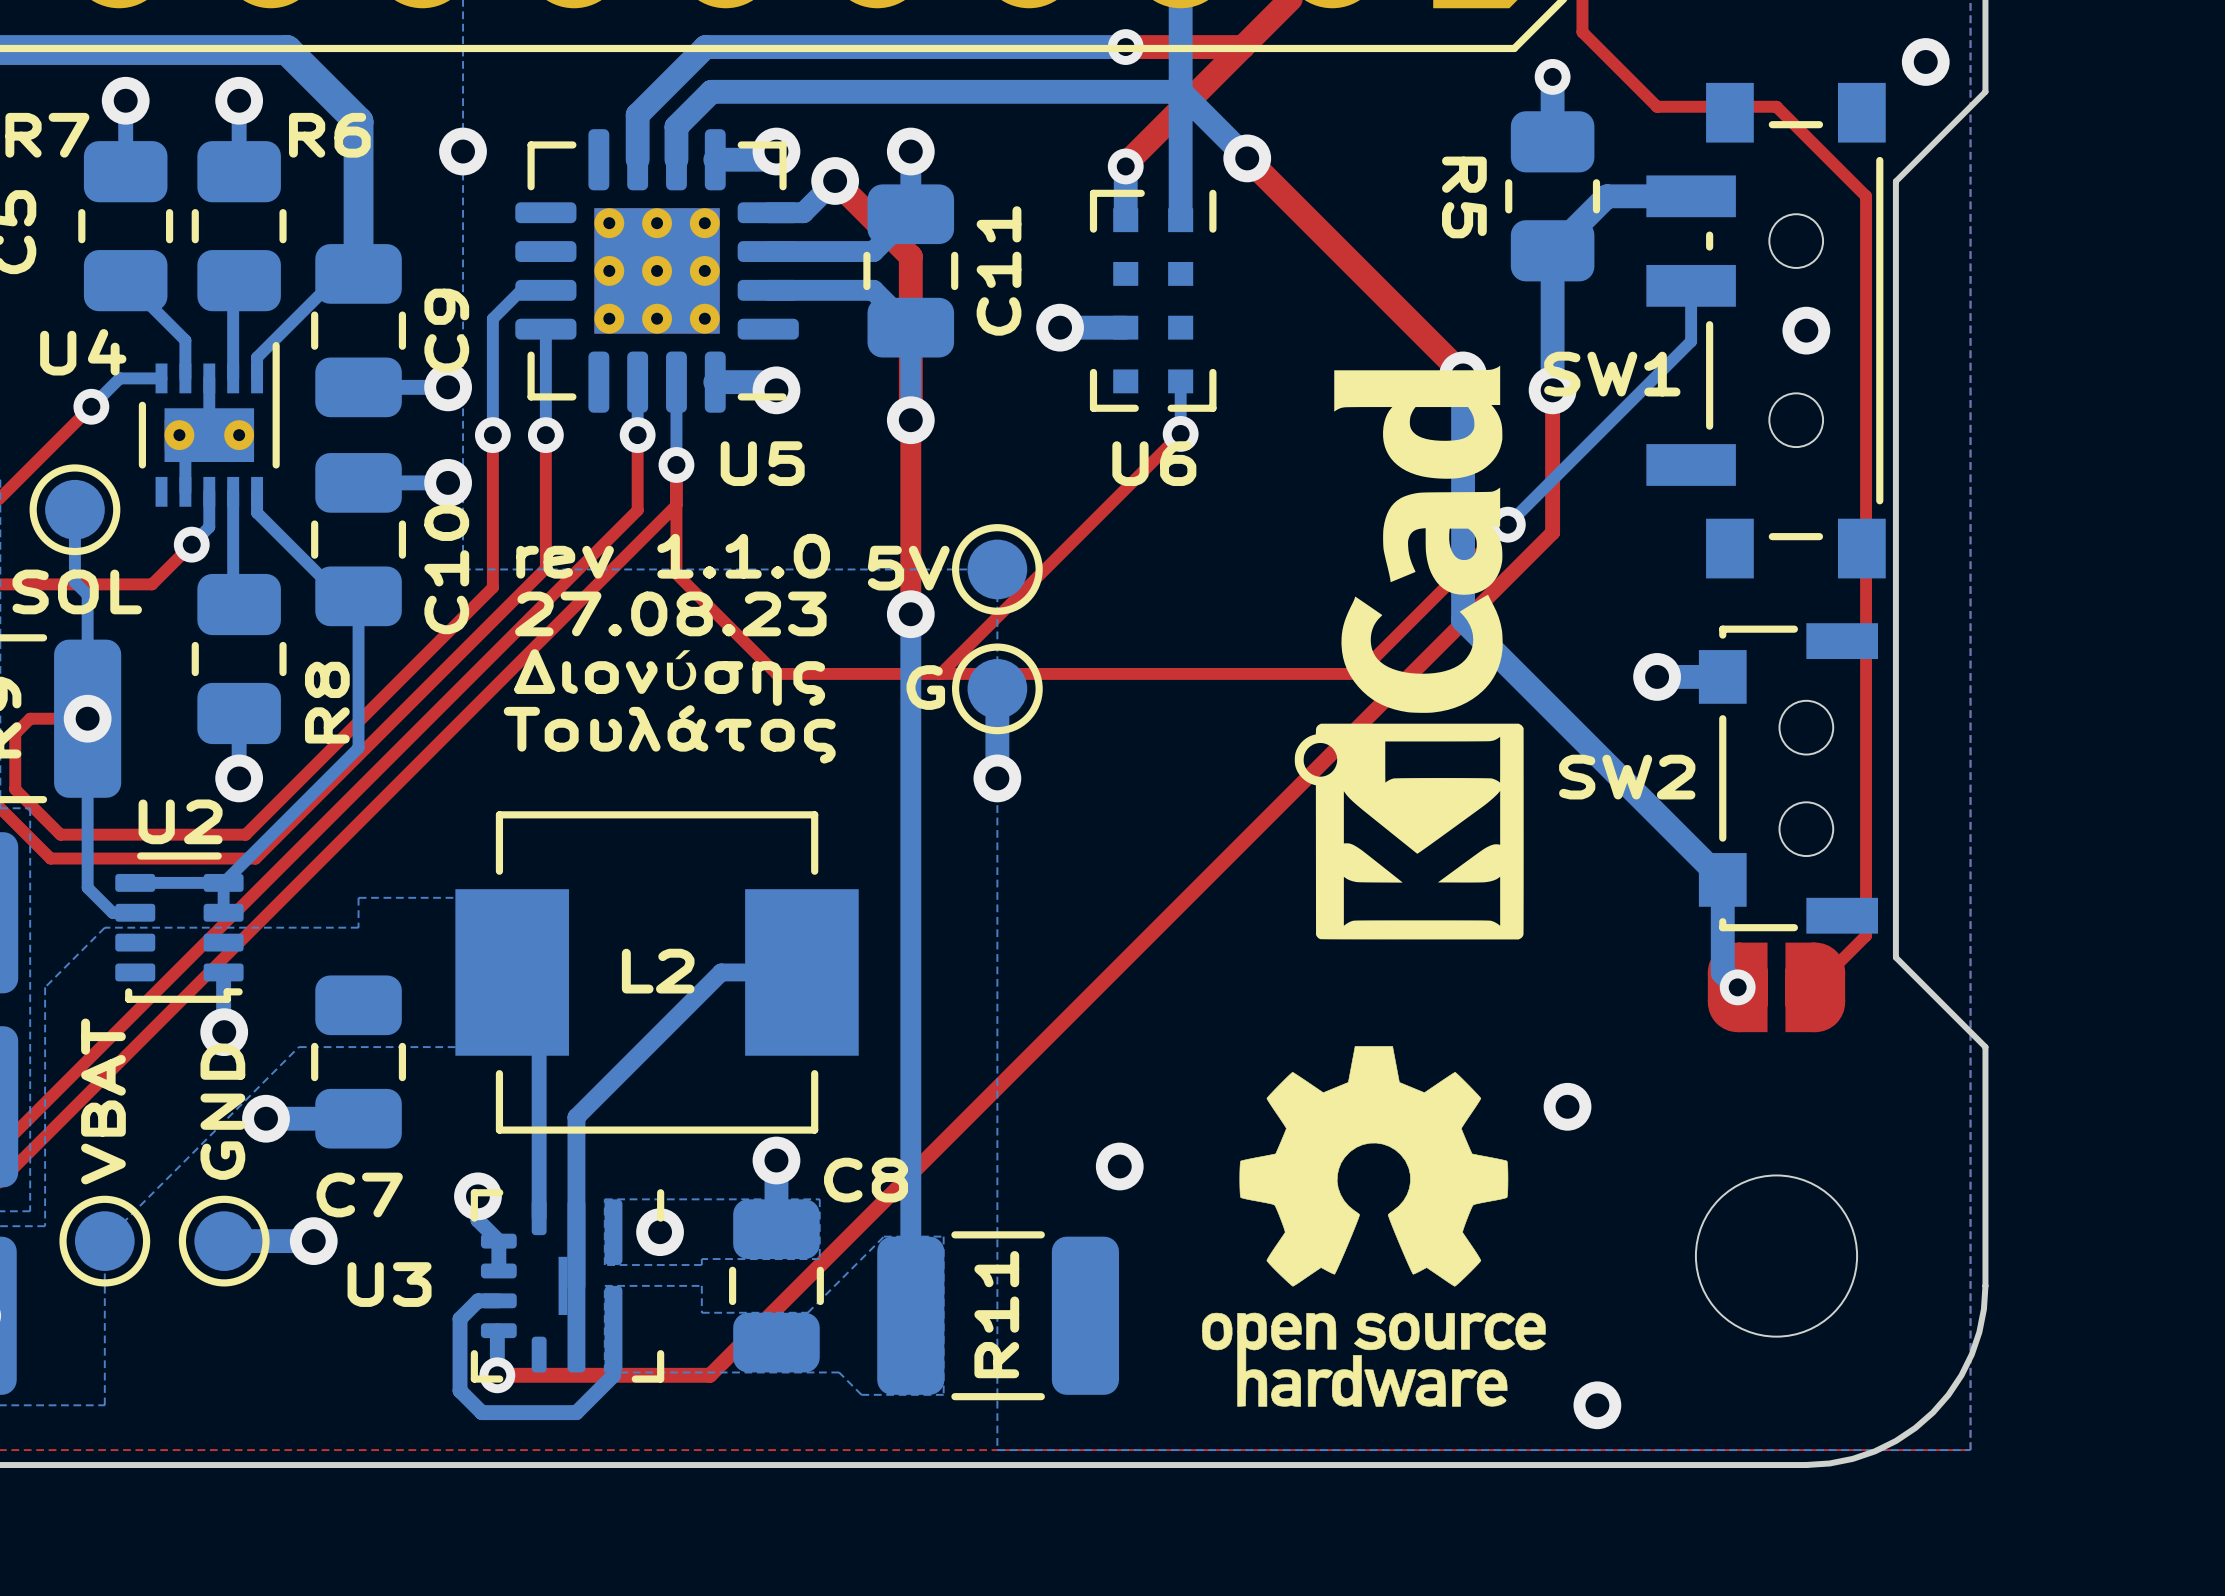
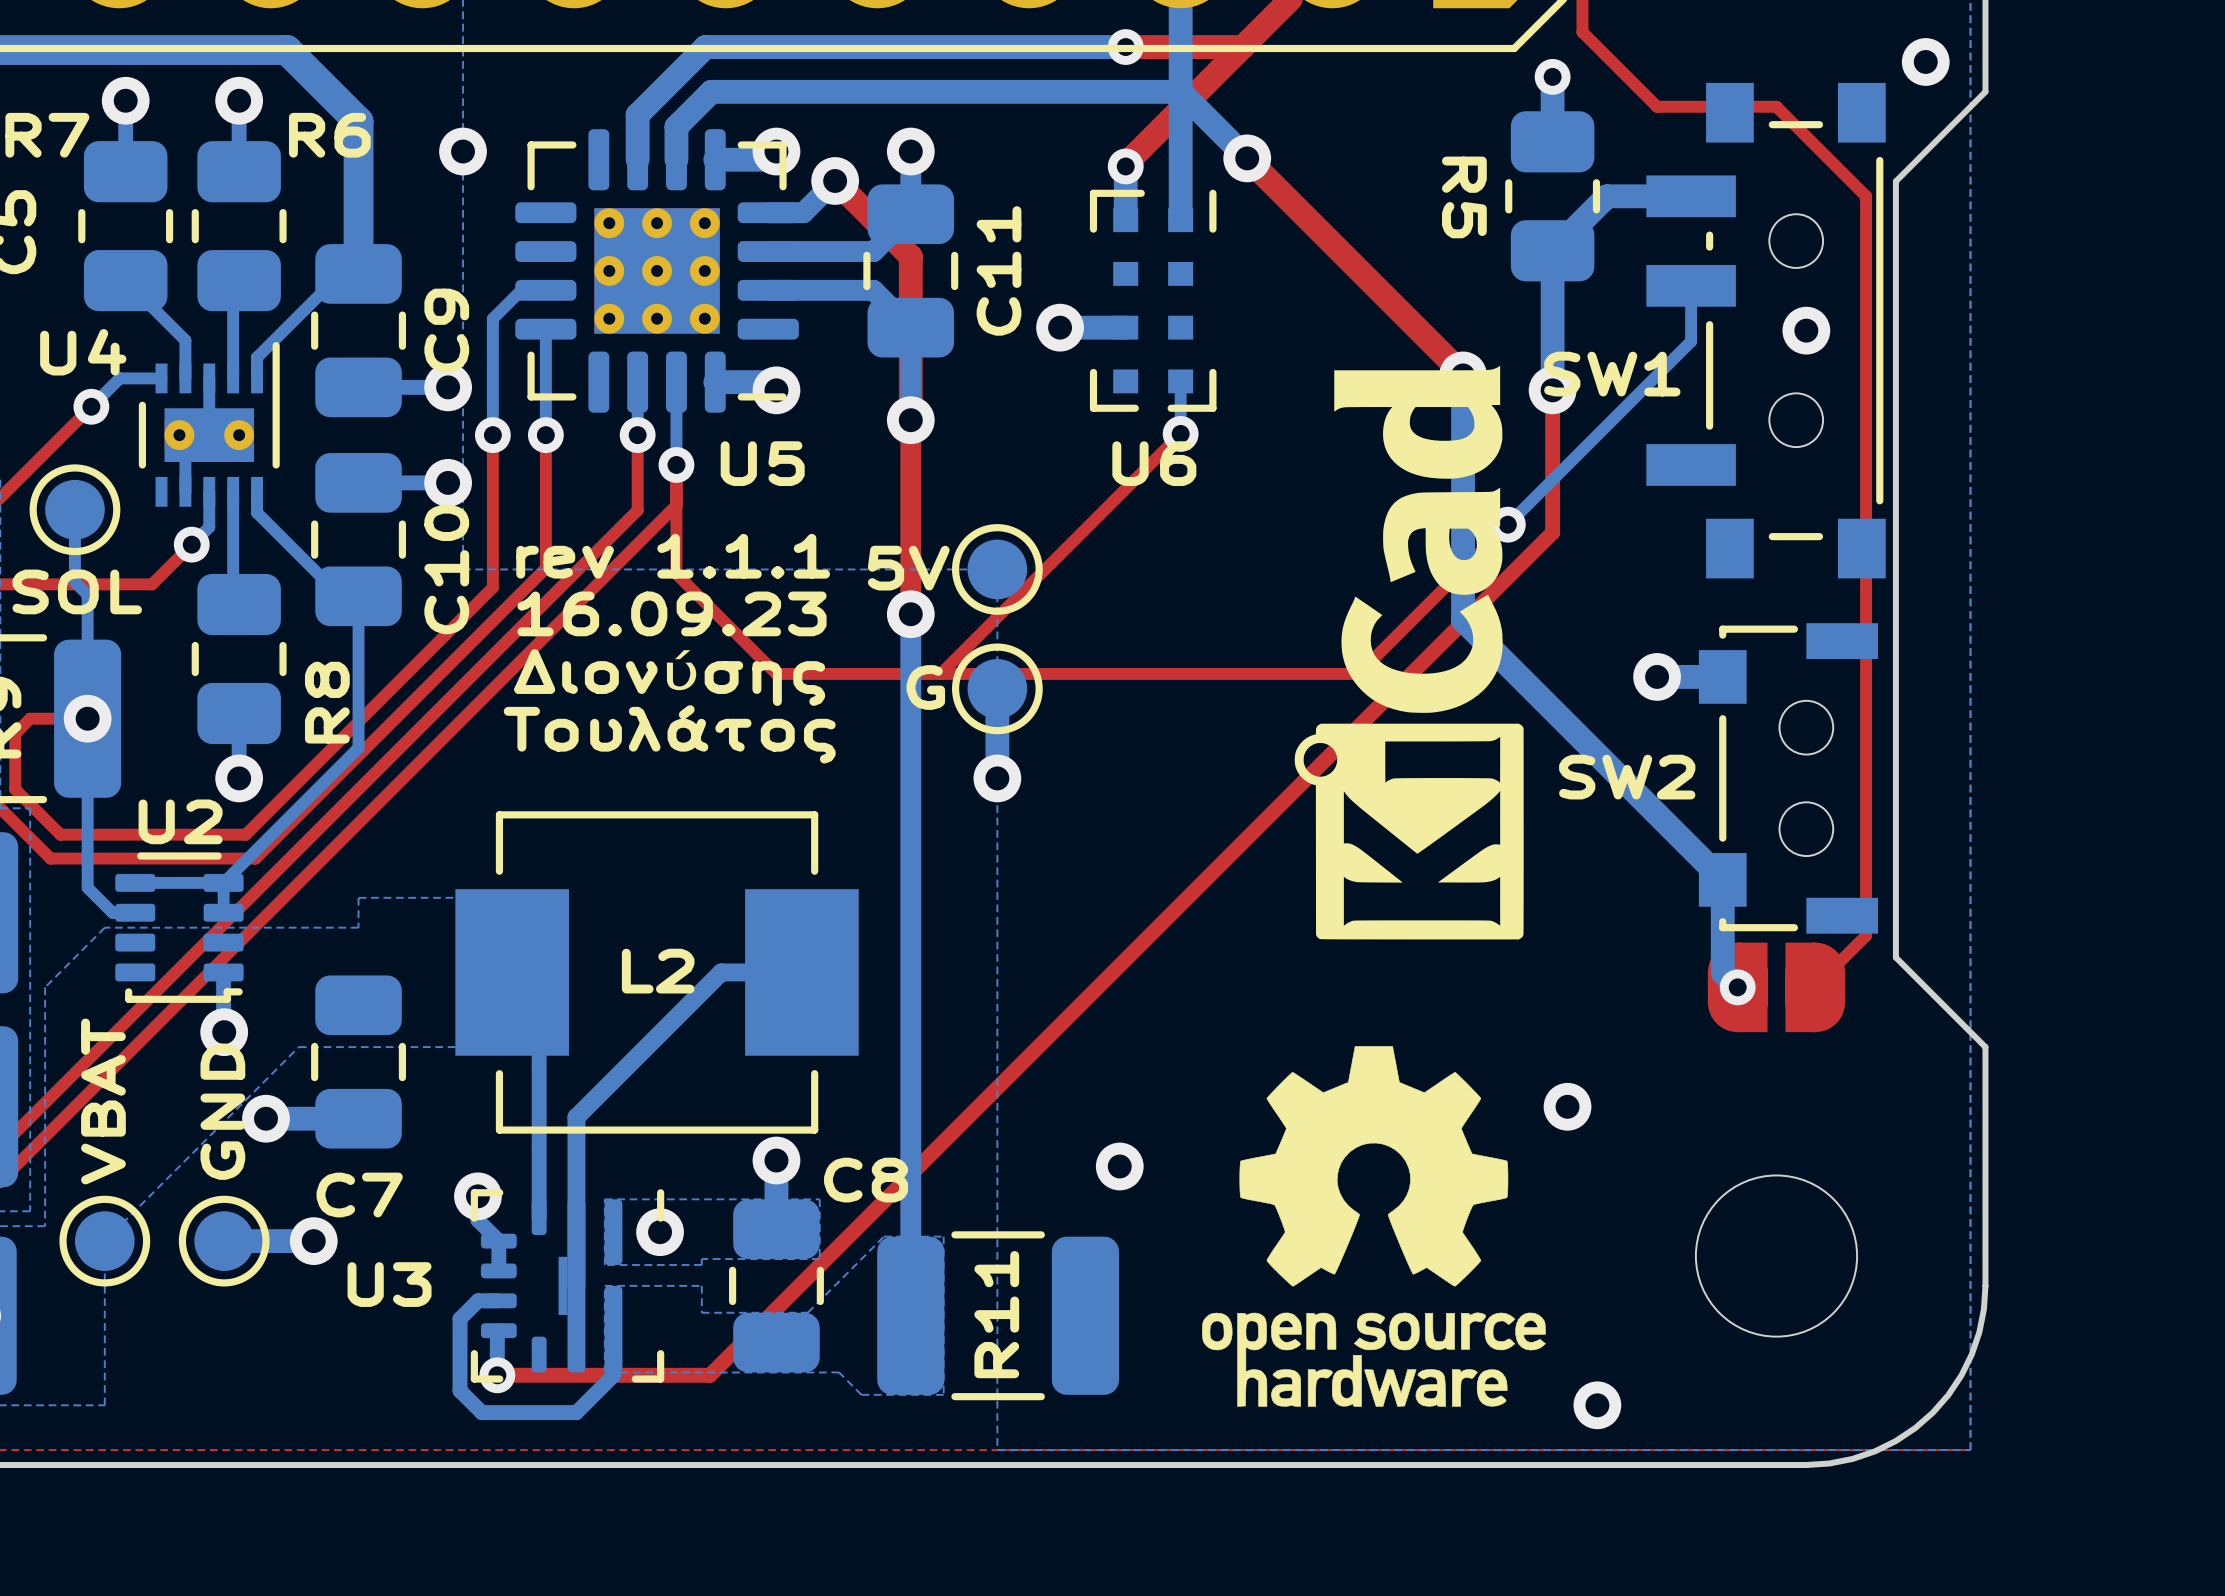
text: rev 1.1.0 (673, 556) -> rev 1.1.1 (673, 556)
text: 27.08.23 (670, 613) -> 16.09.23 (671, 613)

